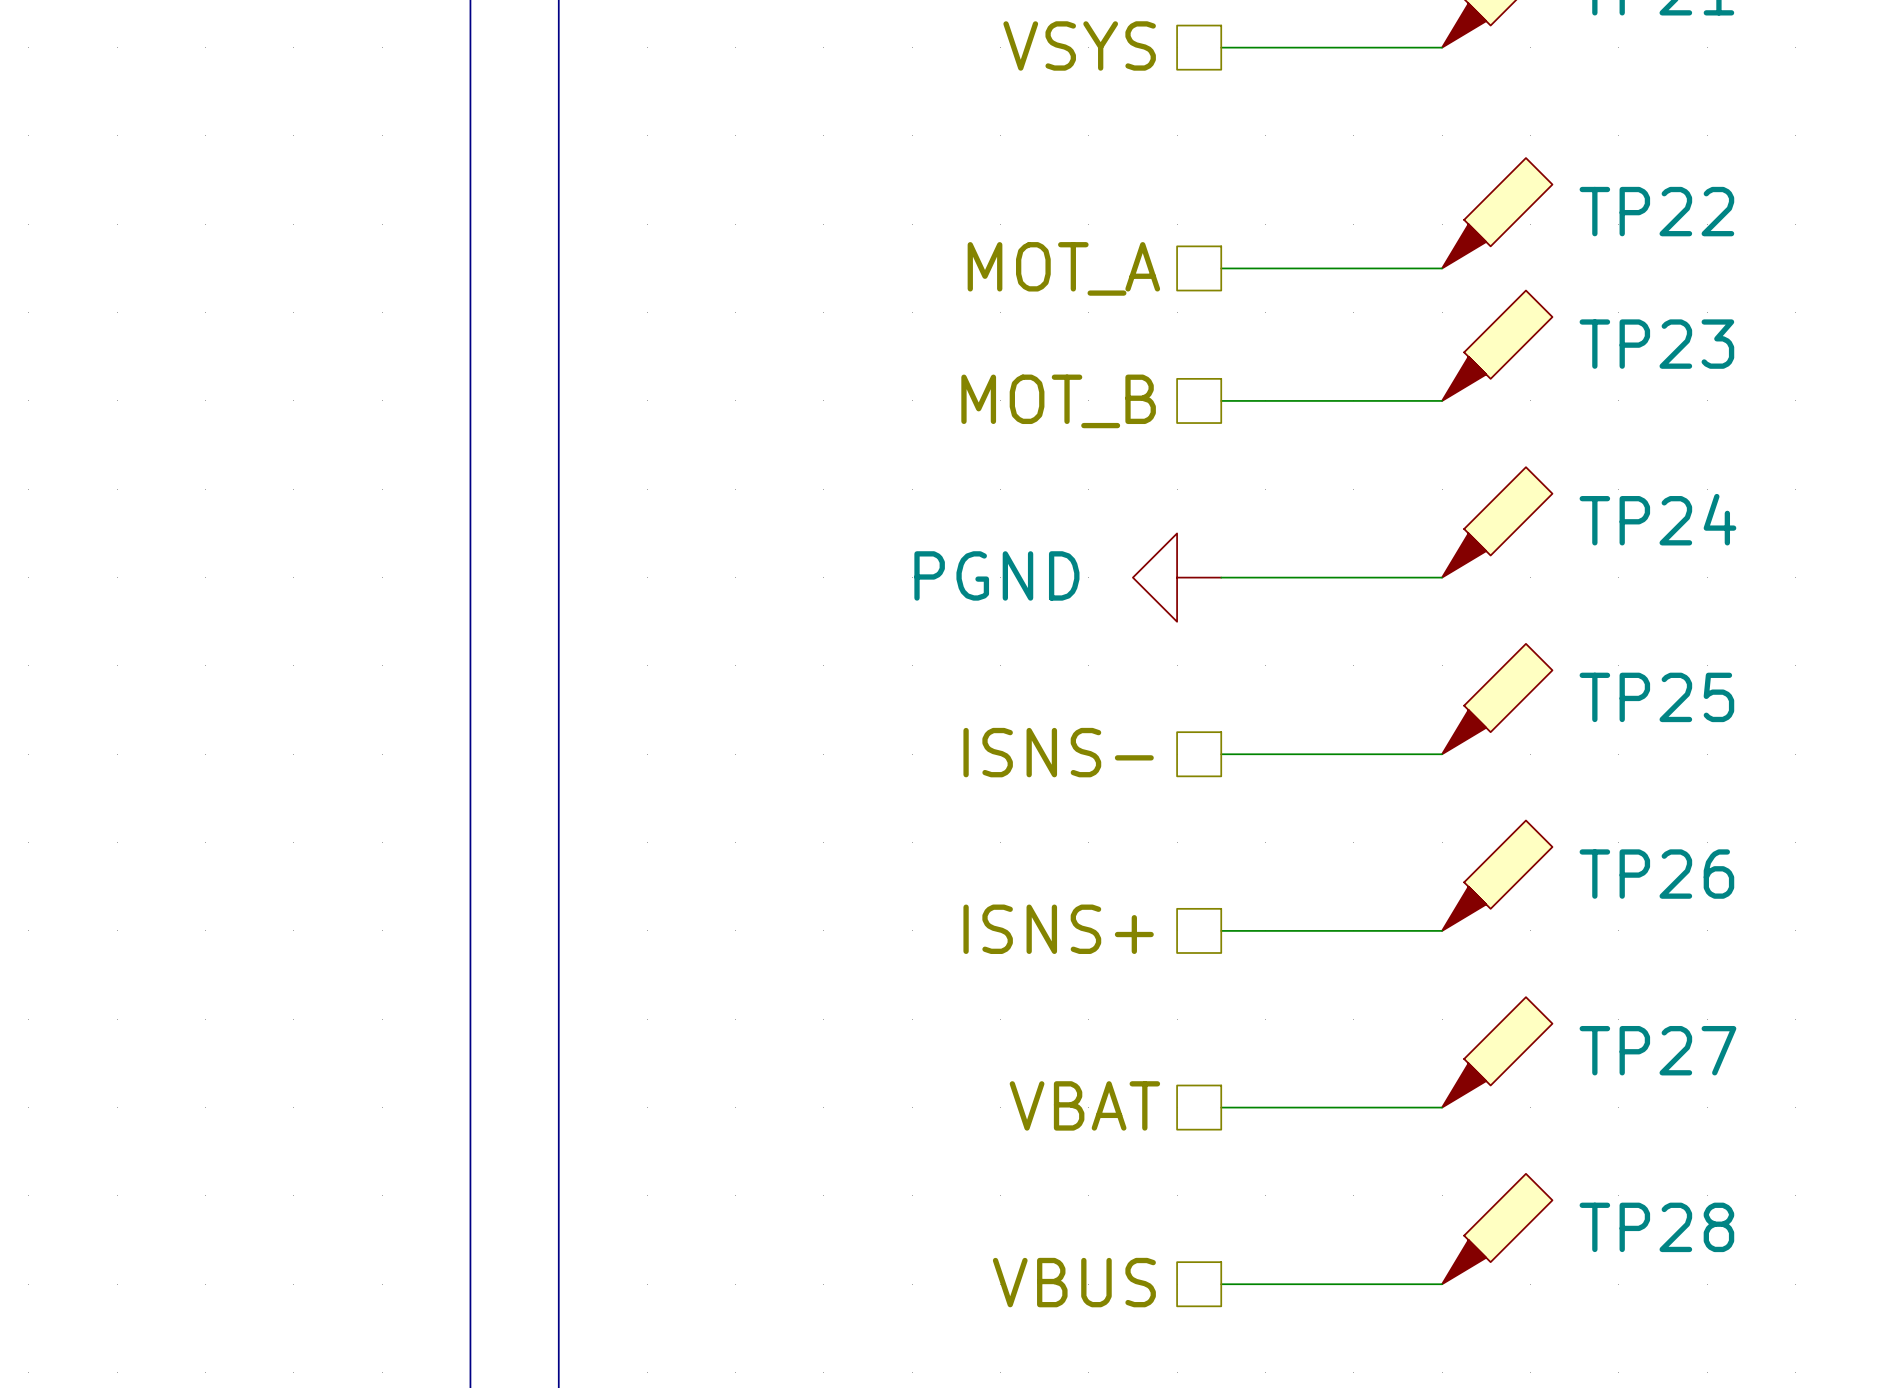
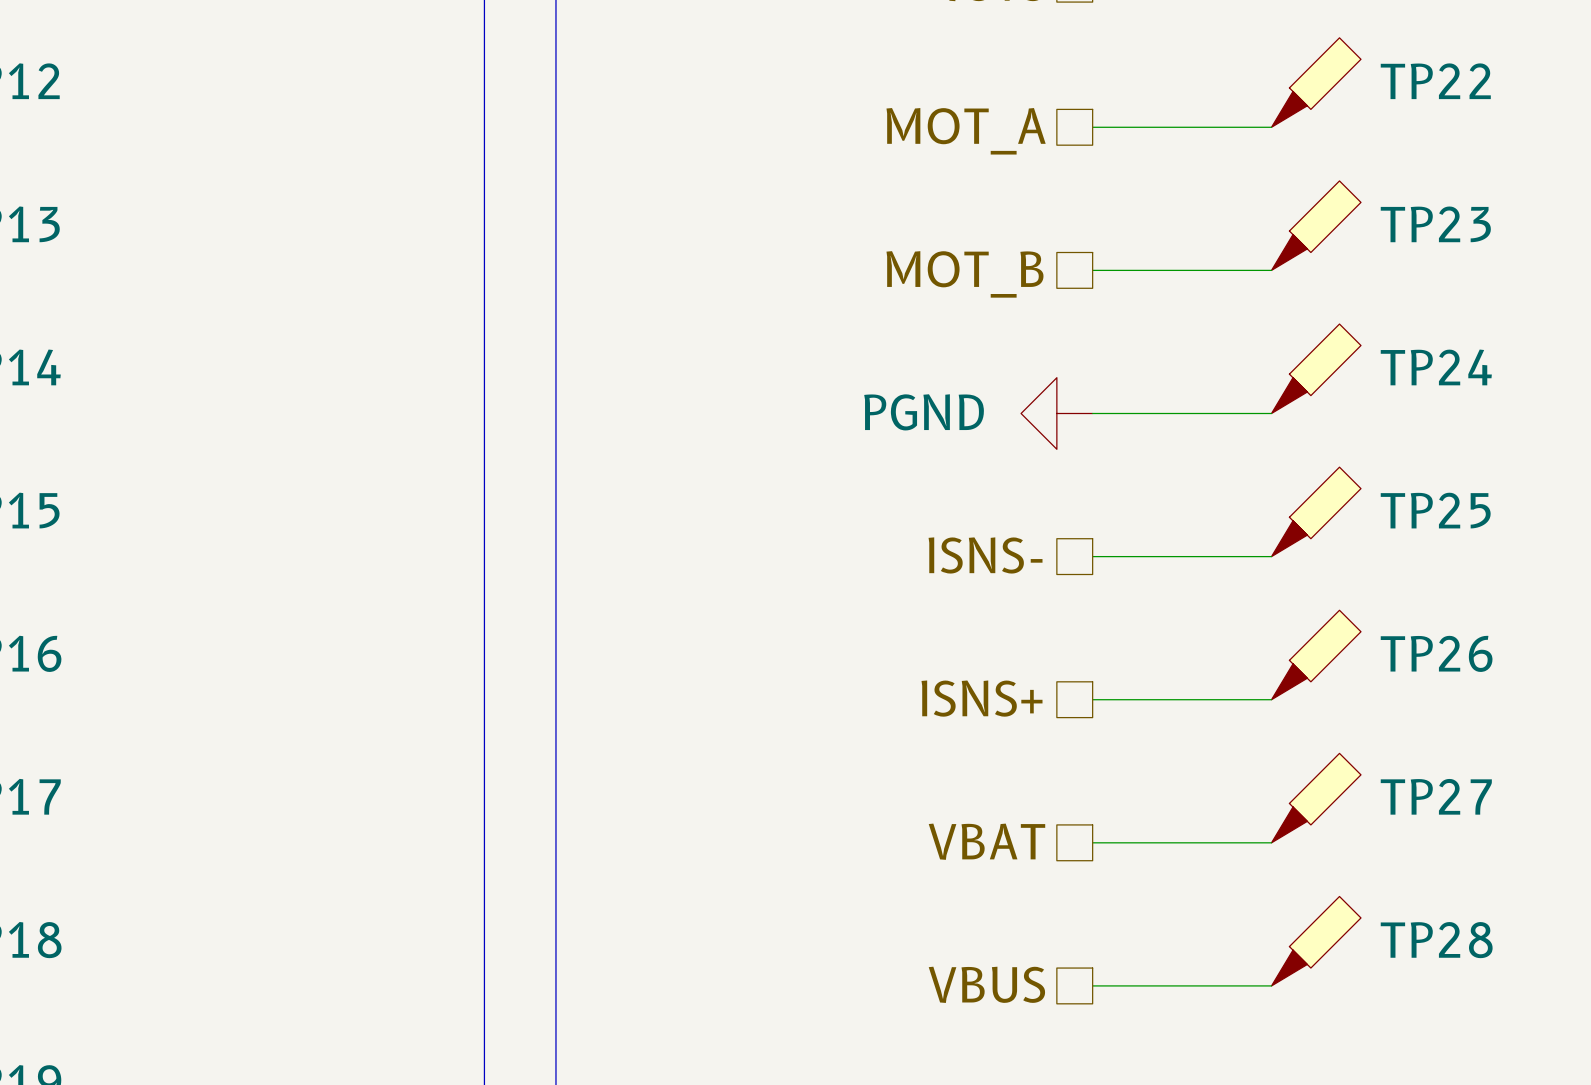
TP22 position: (1497, 213) -> (1316, 82)
hierarchical label position: MOT_A (1063, 268) -> MOT_A (966, 131)
wire: (1221, 268) (1442, 268) -> (1092, 127) (1271, 127)

